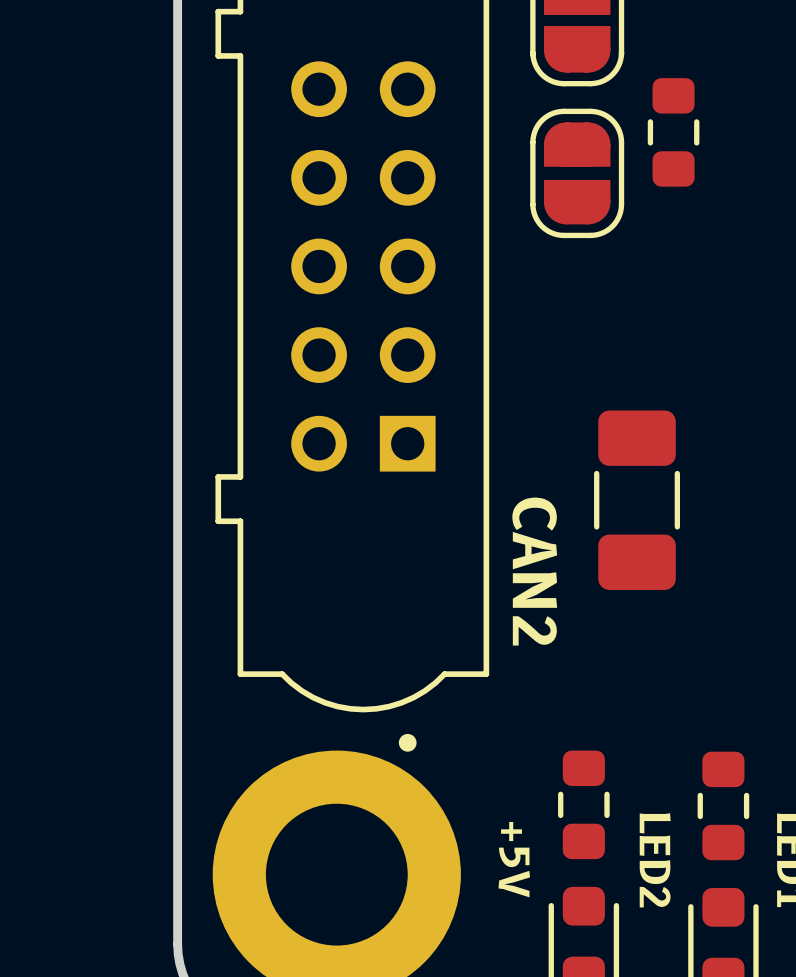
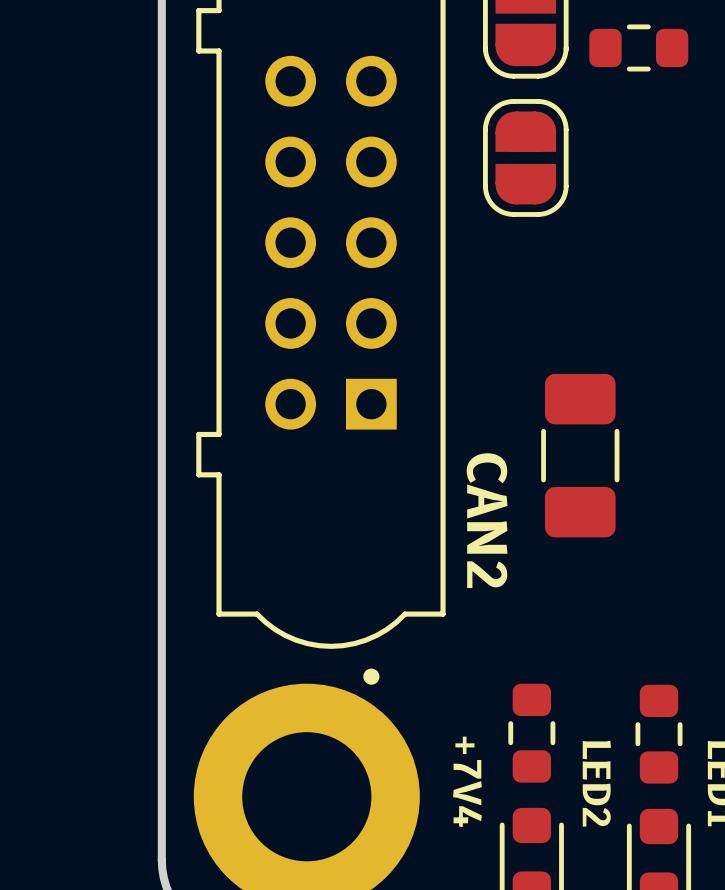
part rotation: 0° (673, 132) -> 90° clockwise (638, 47)
part position: (673, 132) -> (638, 47)
text: +5V (514, 859) -> +7V4 (467, 781)

